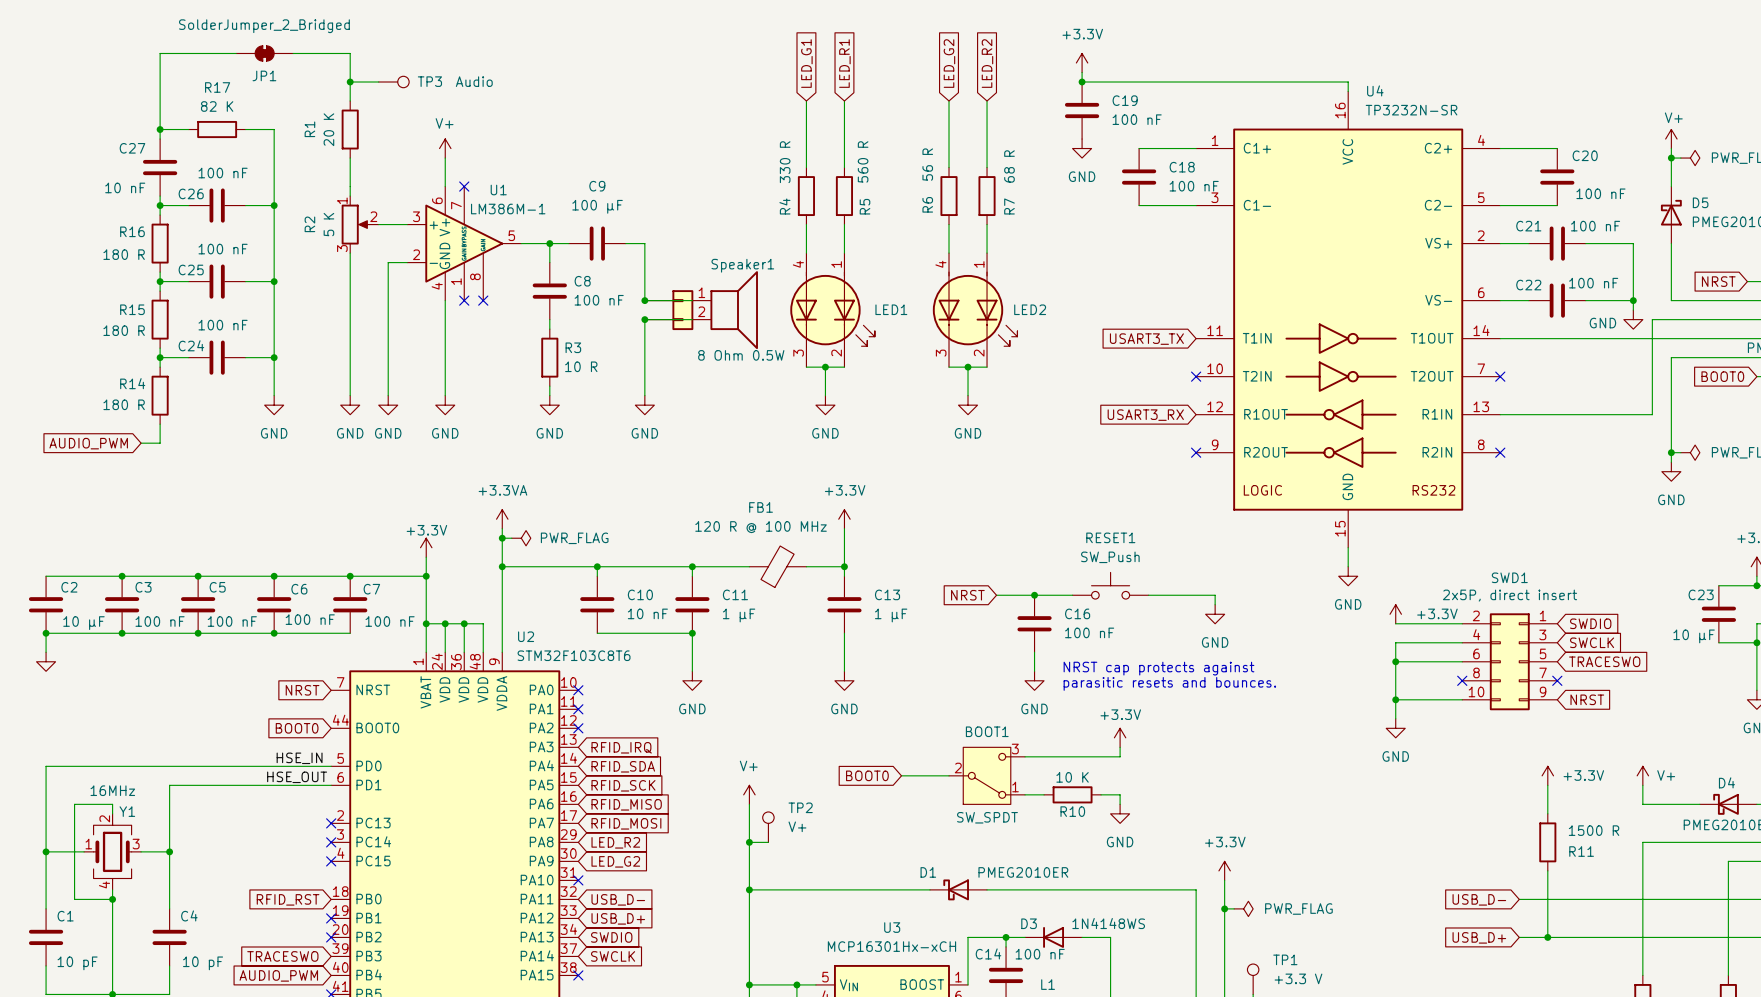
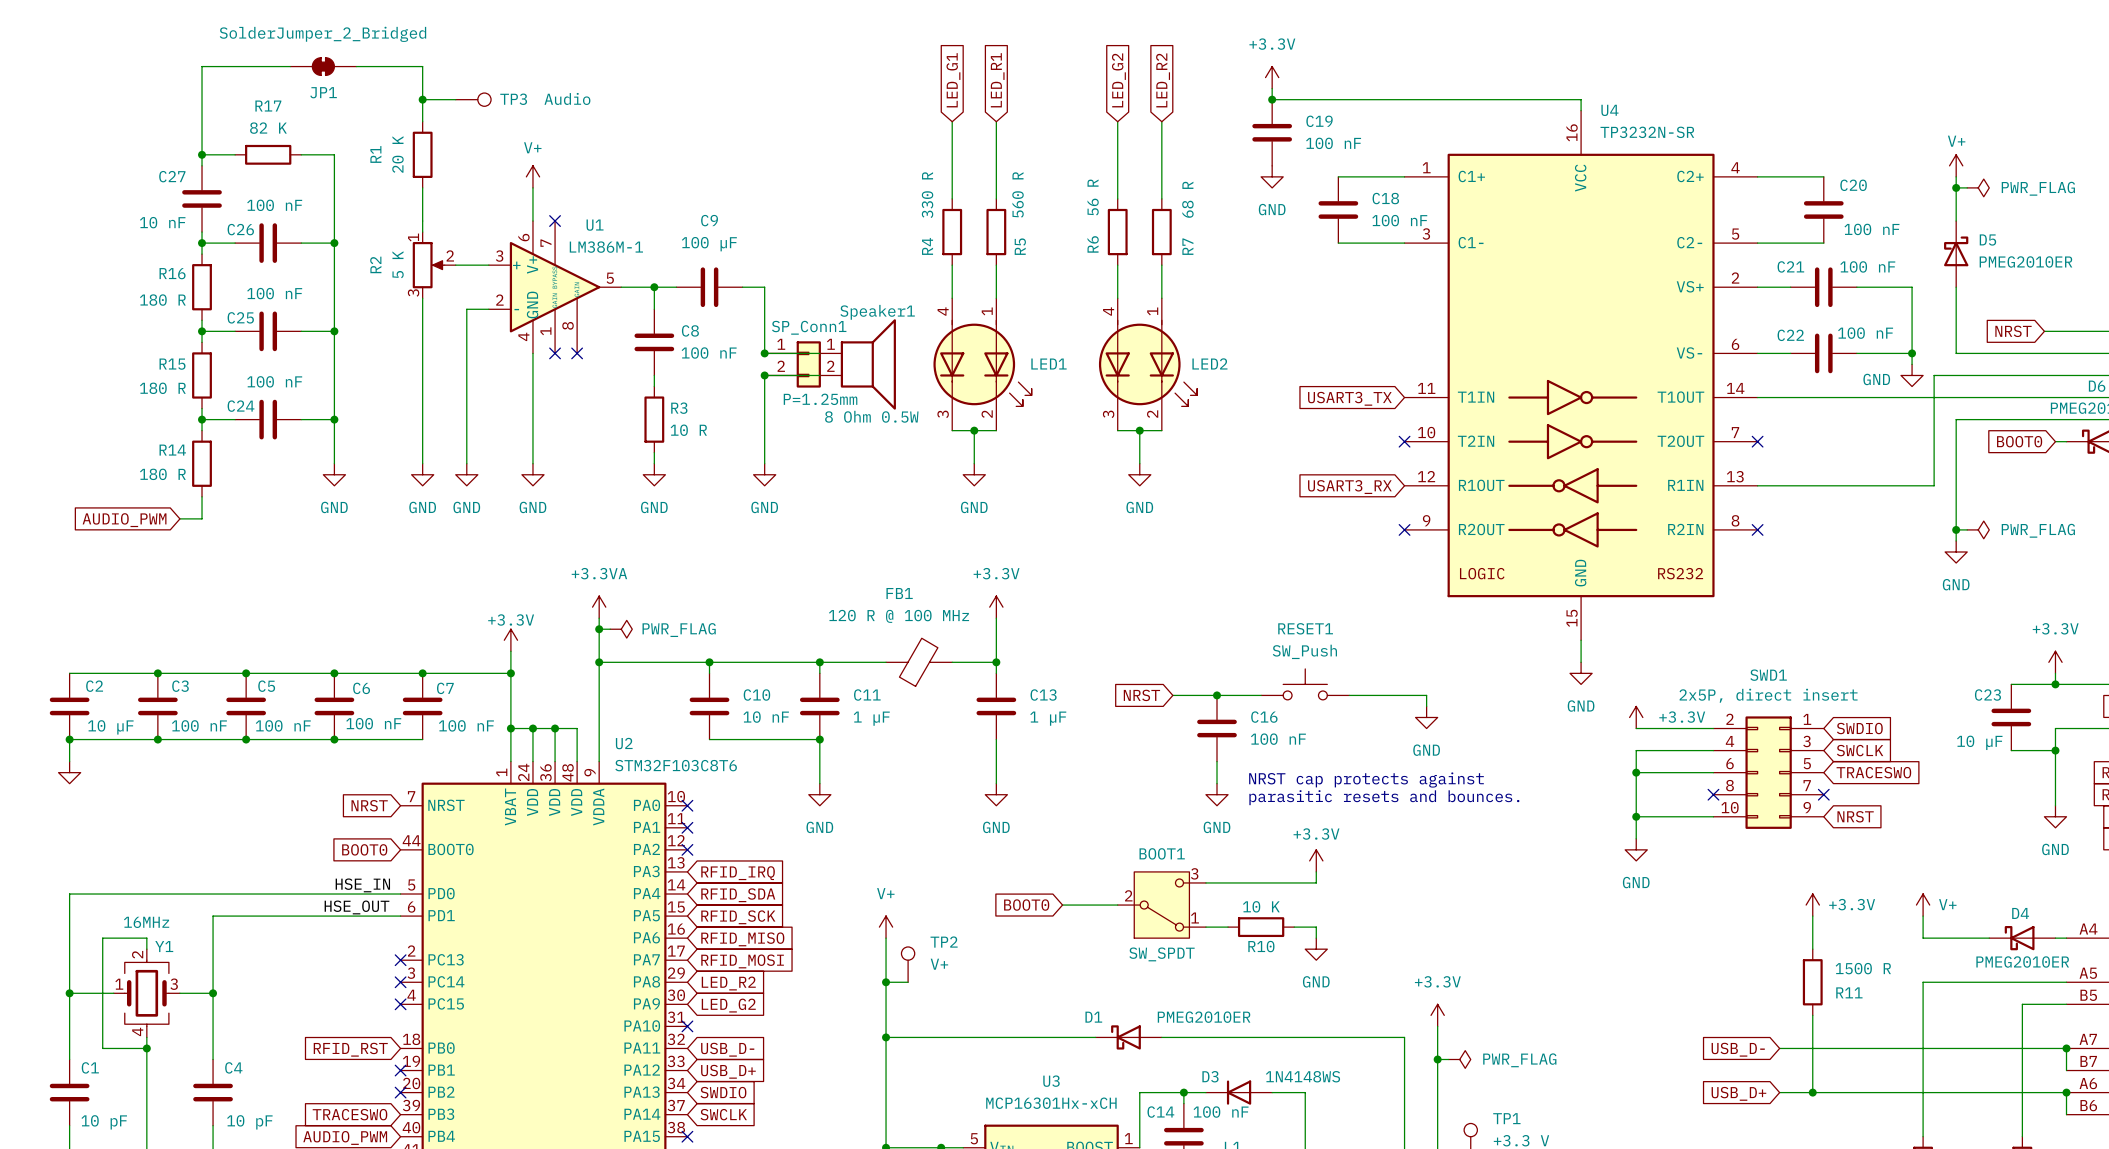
SP_Conn1 name: none -> SP_Conn1 (809, 327)
SP_Conn1 pin number: none -> 1 (781, 344)
SP_Conn1 pin number: none -> 2 (781, 366)
SP_Conn1 value: none -> P=1.25mm (820, 399)

